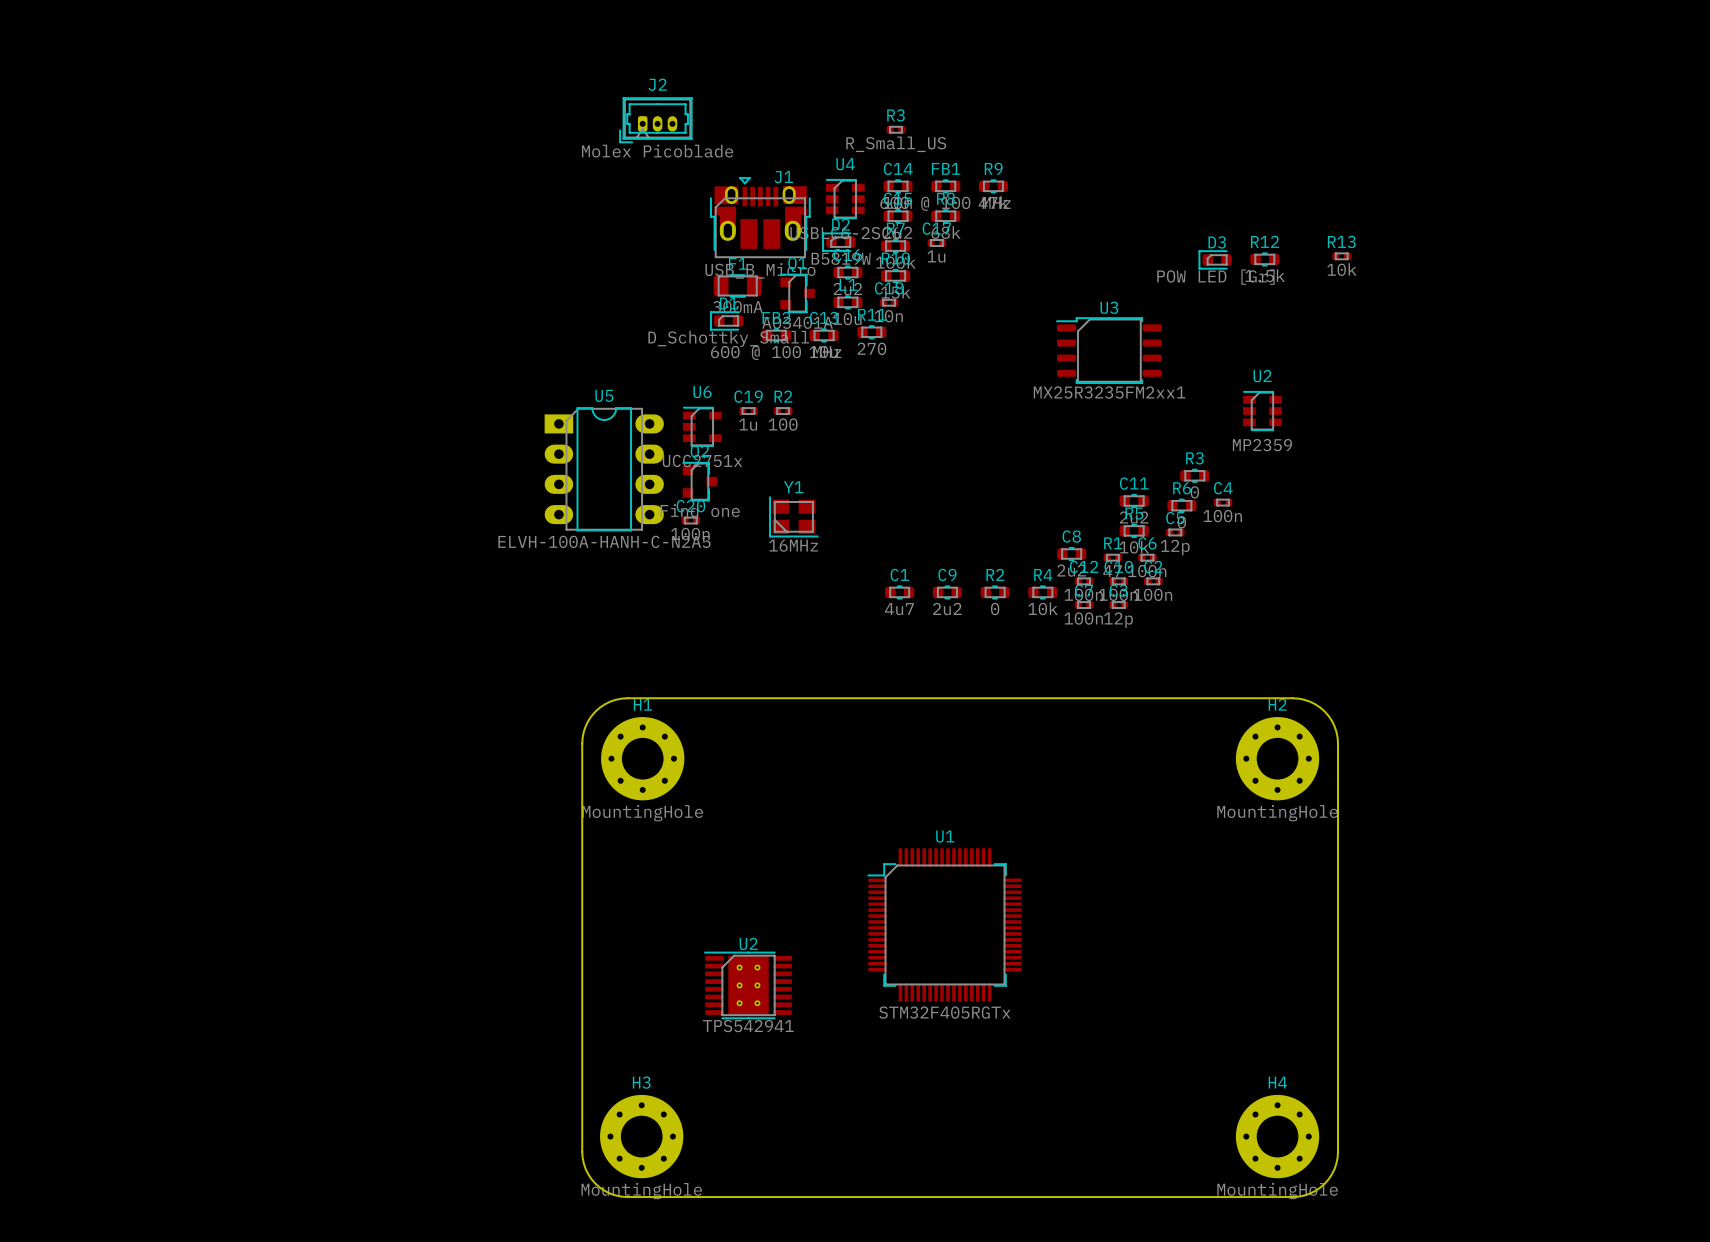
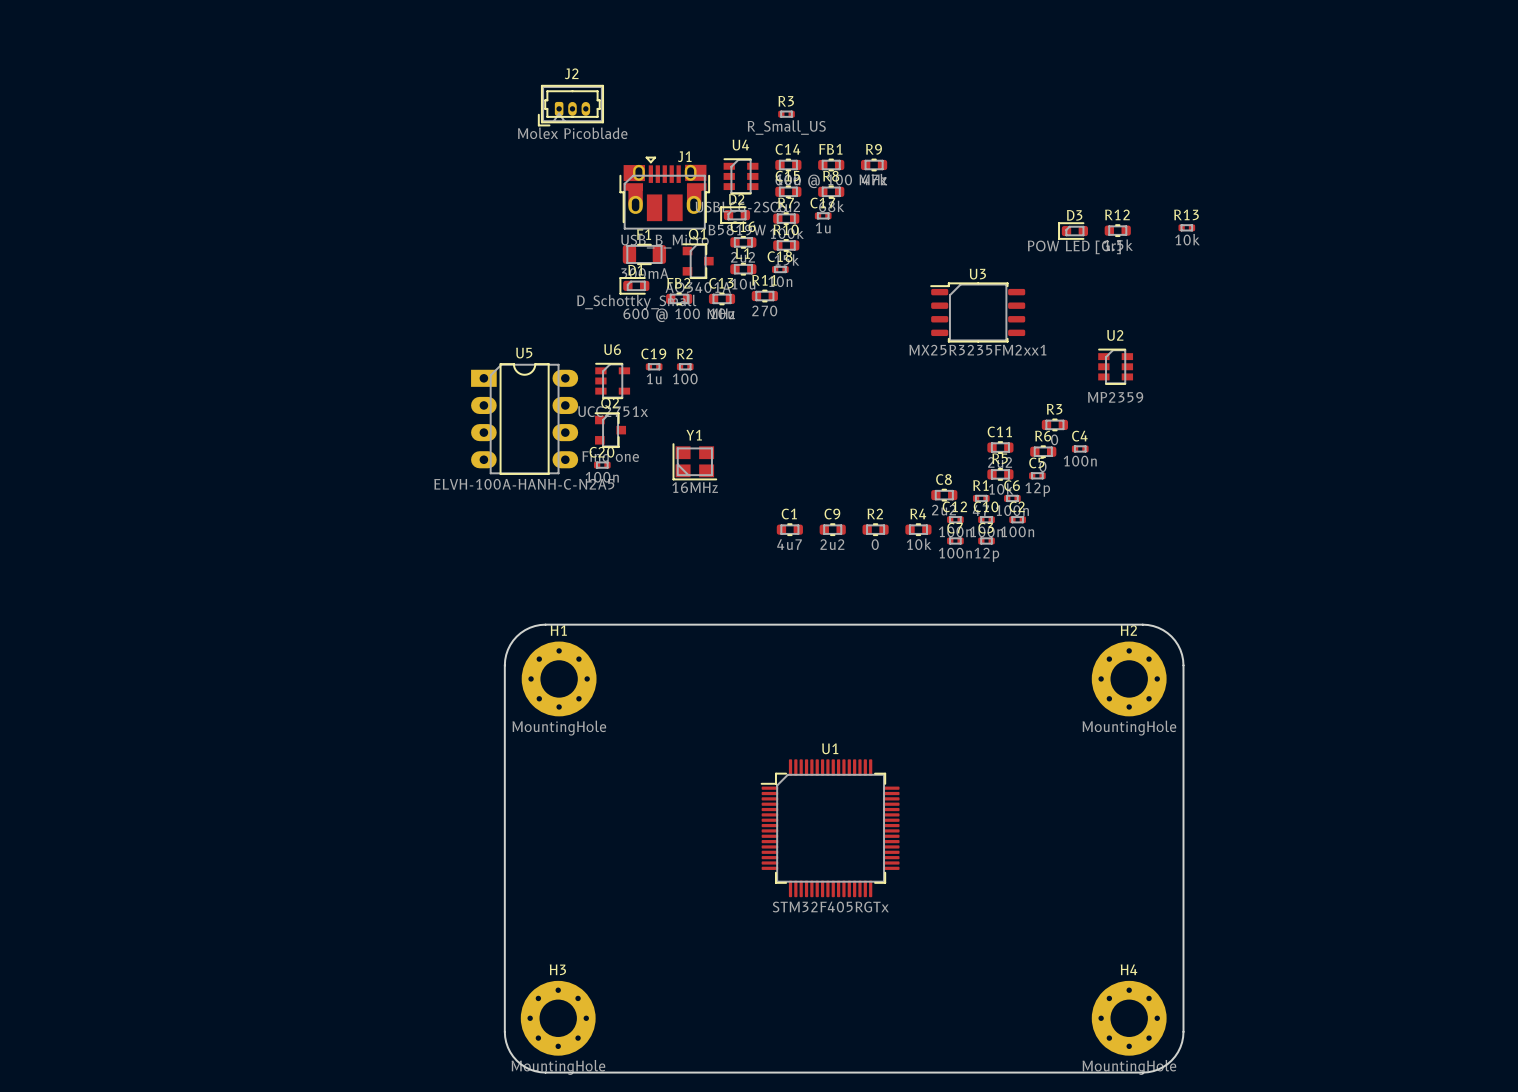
U2: TPS542941 (748, 985) -> none

